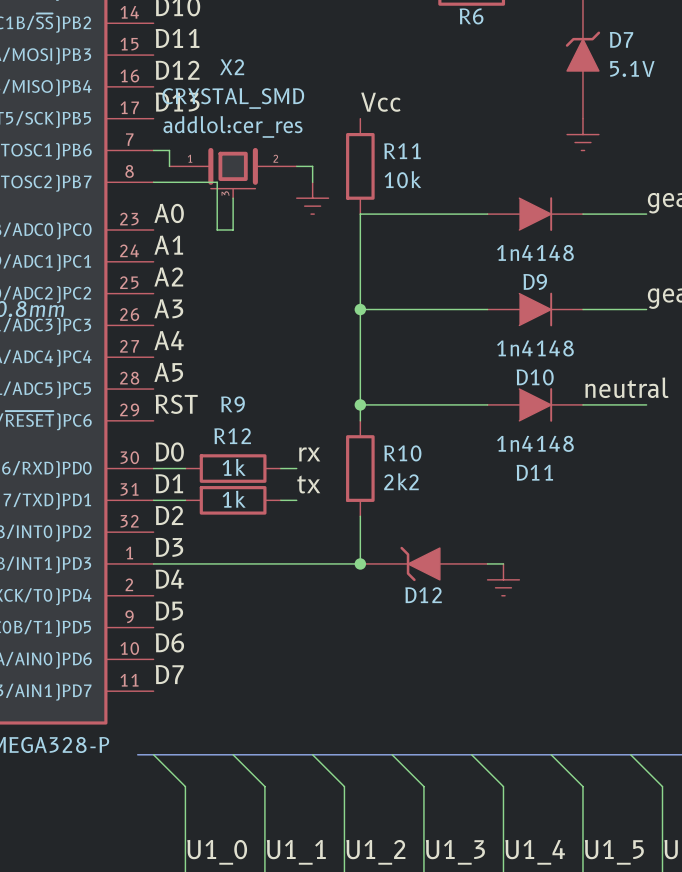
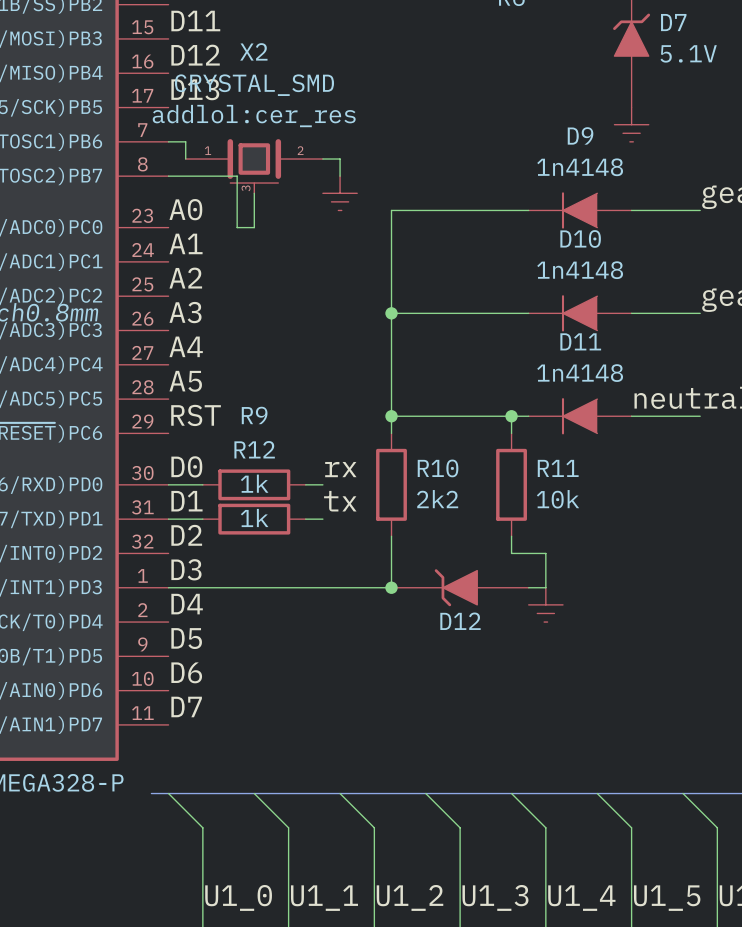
label: Vcc (380, 102) -> none
R11 position: (360, 166) -> (511, 484)
D9 rotation: 0° (535, 214) -> 180° (579, 210)
D10 rotation: 0° (535, 309) -> 180° (579, 313)
wire: none -> (511, 416) (511, 433)
junction: none -> (511, 416)
D11 rotation: 0° (535, 404) -> 180° (579, 416)
wire: none -> (511, 536) (511, 553) (545, 553) (545, 587)

